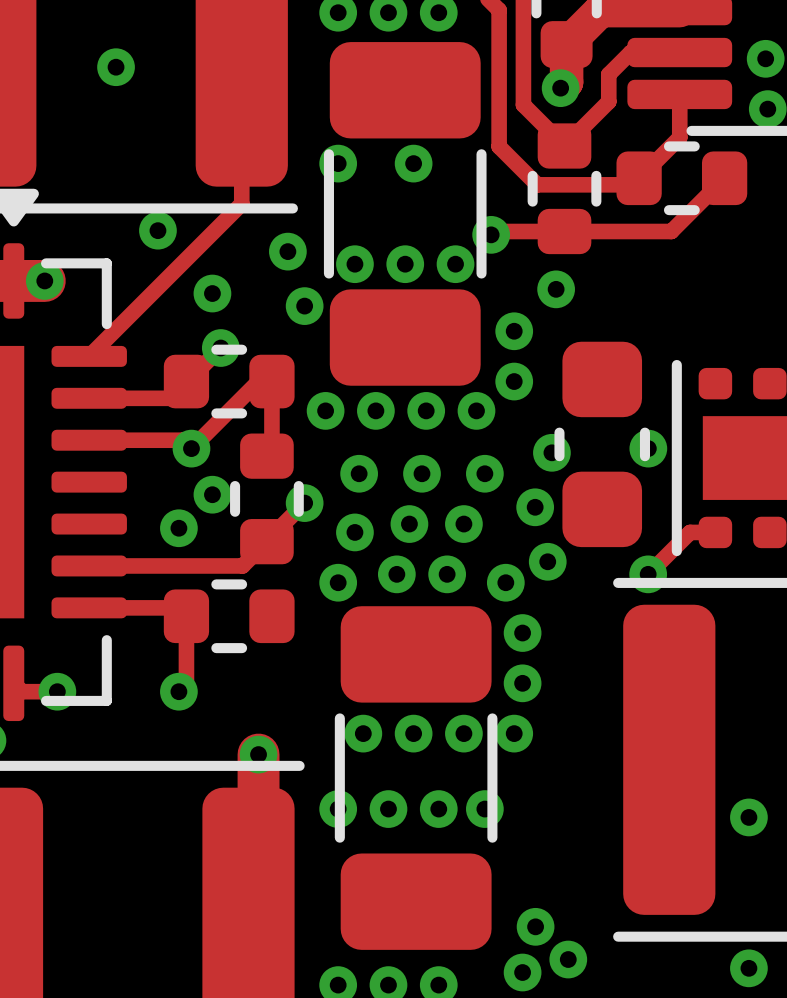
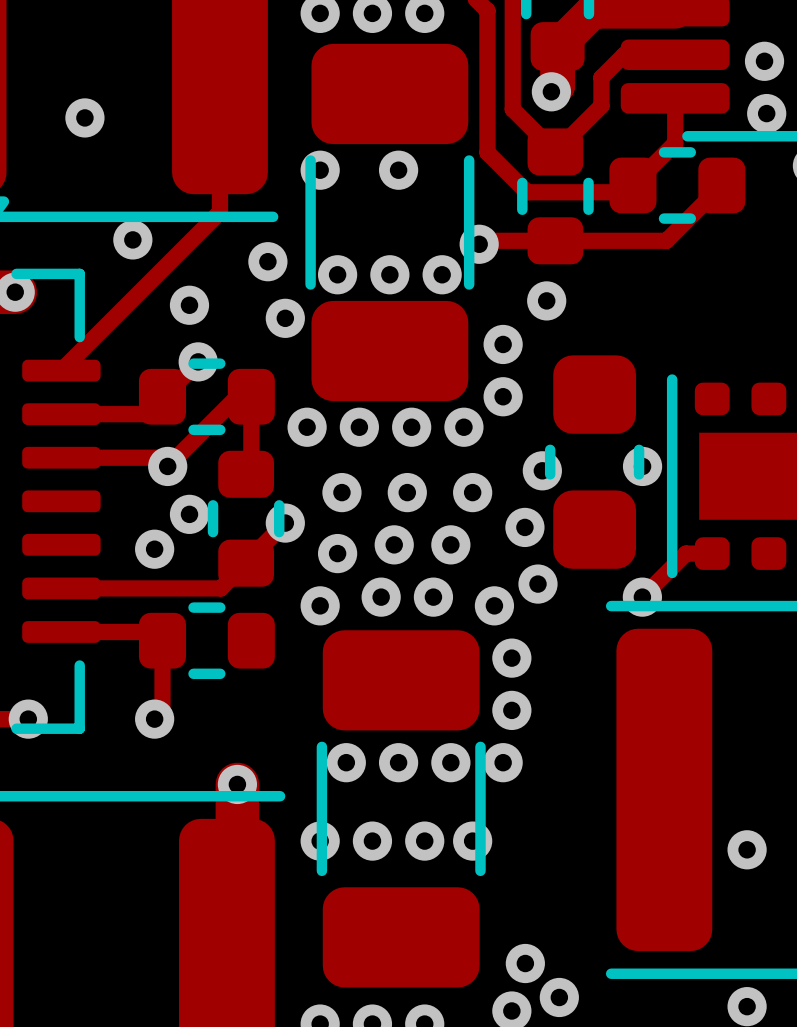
via position: (116, 67) -> (84, 117)

